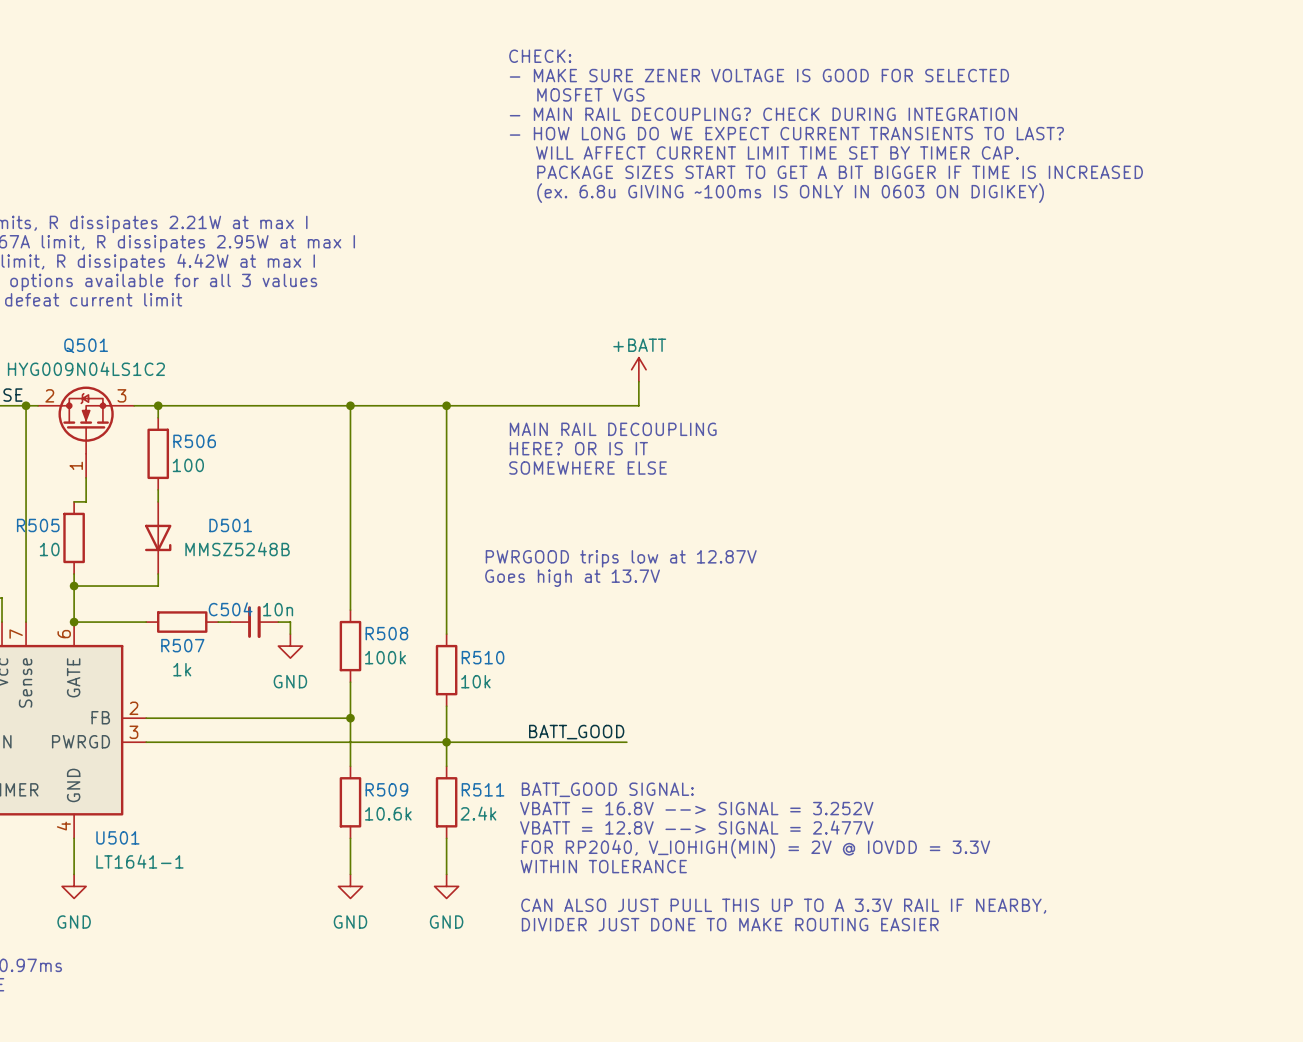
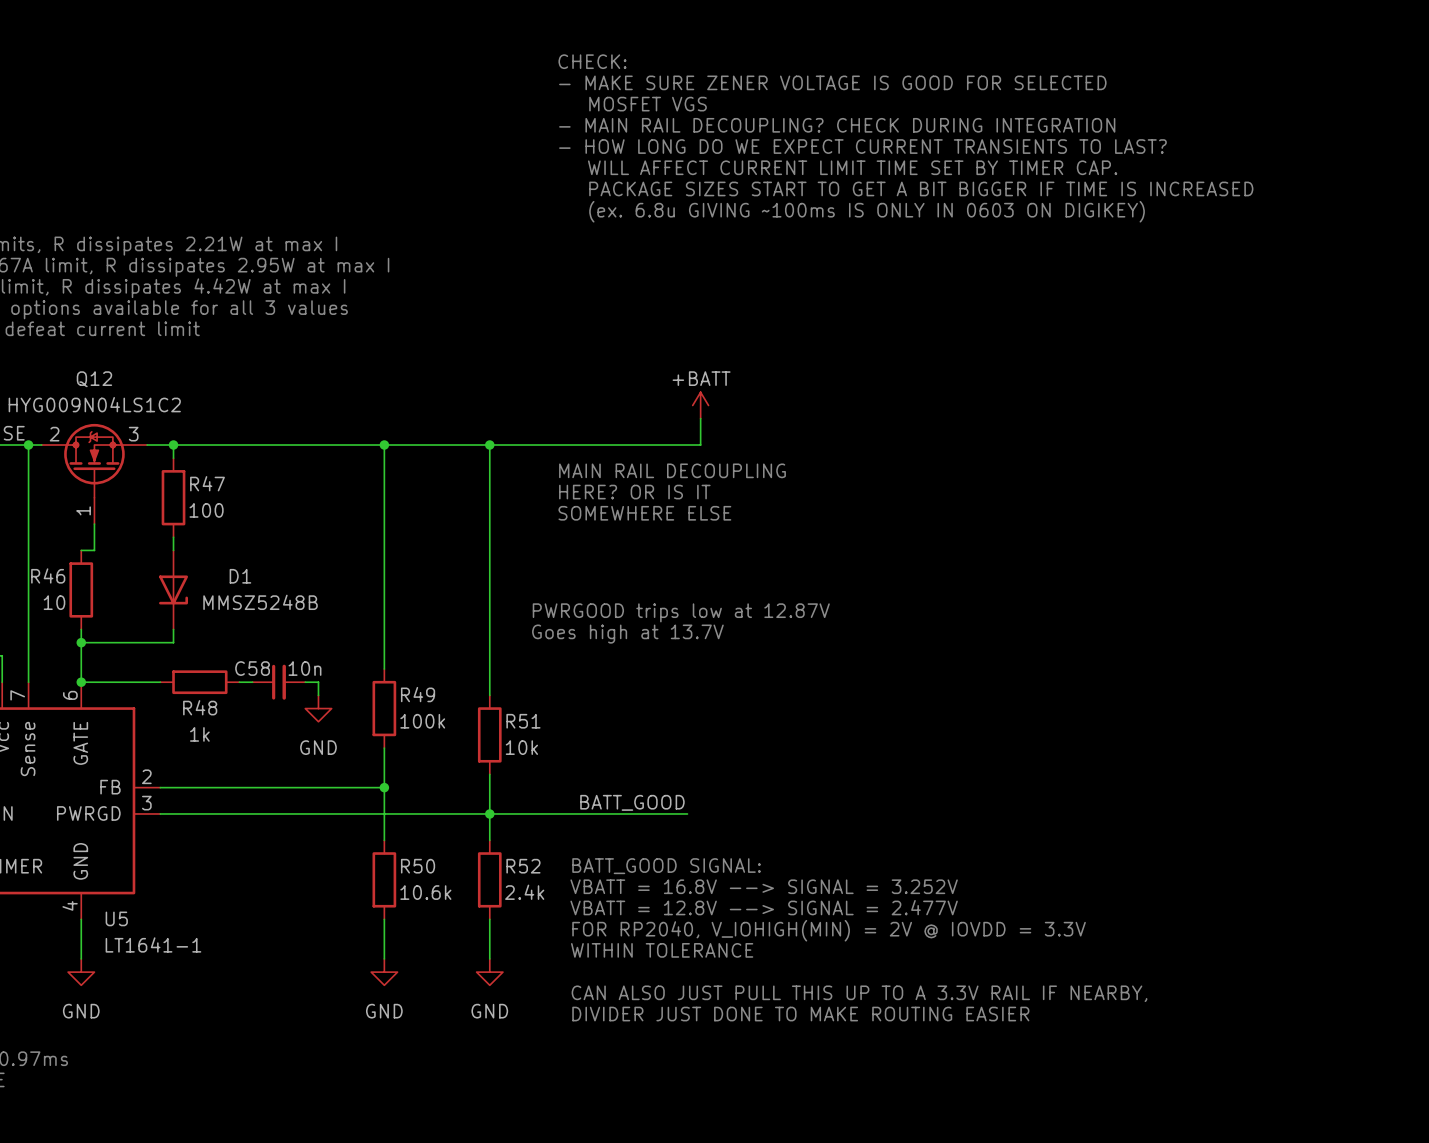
Q501 name: Q501 (86, 345) -> Q12 (94, 379)
R506 name: R506 (194, 441) -> R47 (207, 483)
R505 name: R505 (38, 525) -> R46 (48, 575)
D501 name: D501 (230, 525) -> D1 (240, 576)
C504 name: C504 (230, 609) -> C58 (252, 668)
R508 name: R508 (386, 633) -> R49 (418, 694)
R507 name: R507 (182, 645) -> R48 (200, 707)
R510 name: R510 (483, 657) -> R51 (523, 721)
R509 name: R509 (386, 789) -> R50 (418, 866)
R511 name: R511 (483, 789) -> R52 (523, 866)
U501 name: U501 (117, 837) -> U5 (116, 918)

